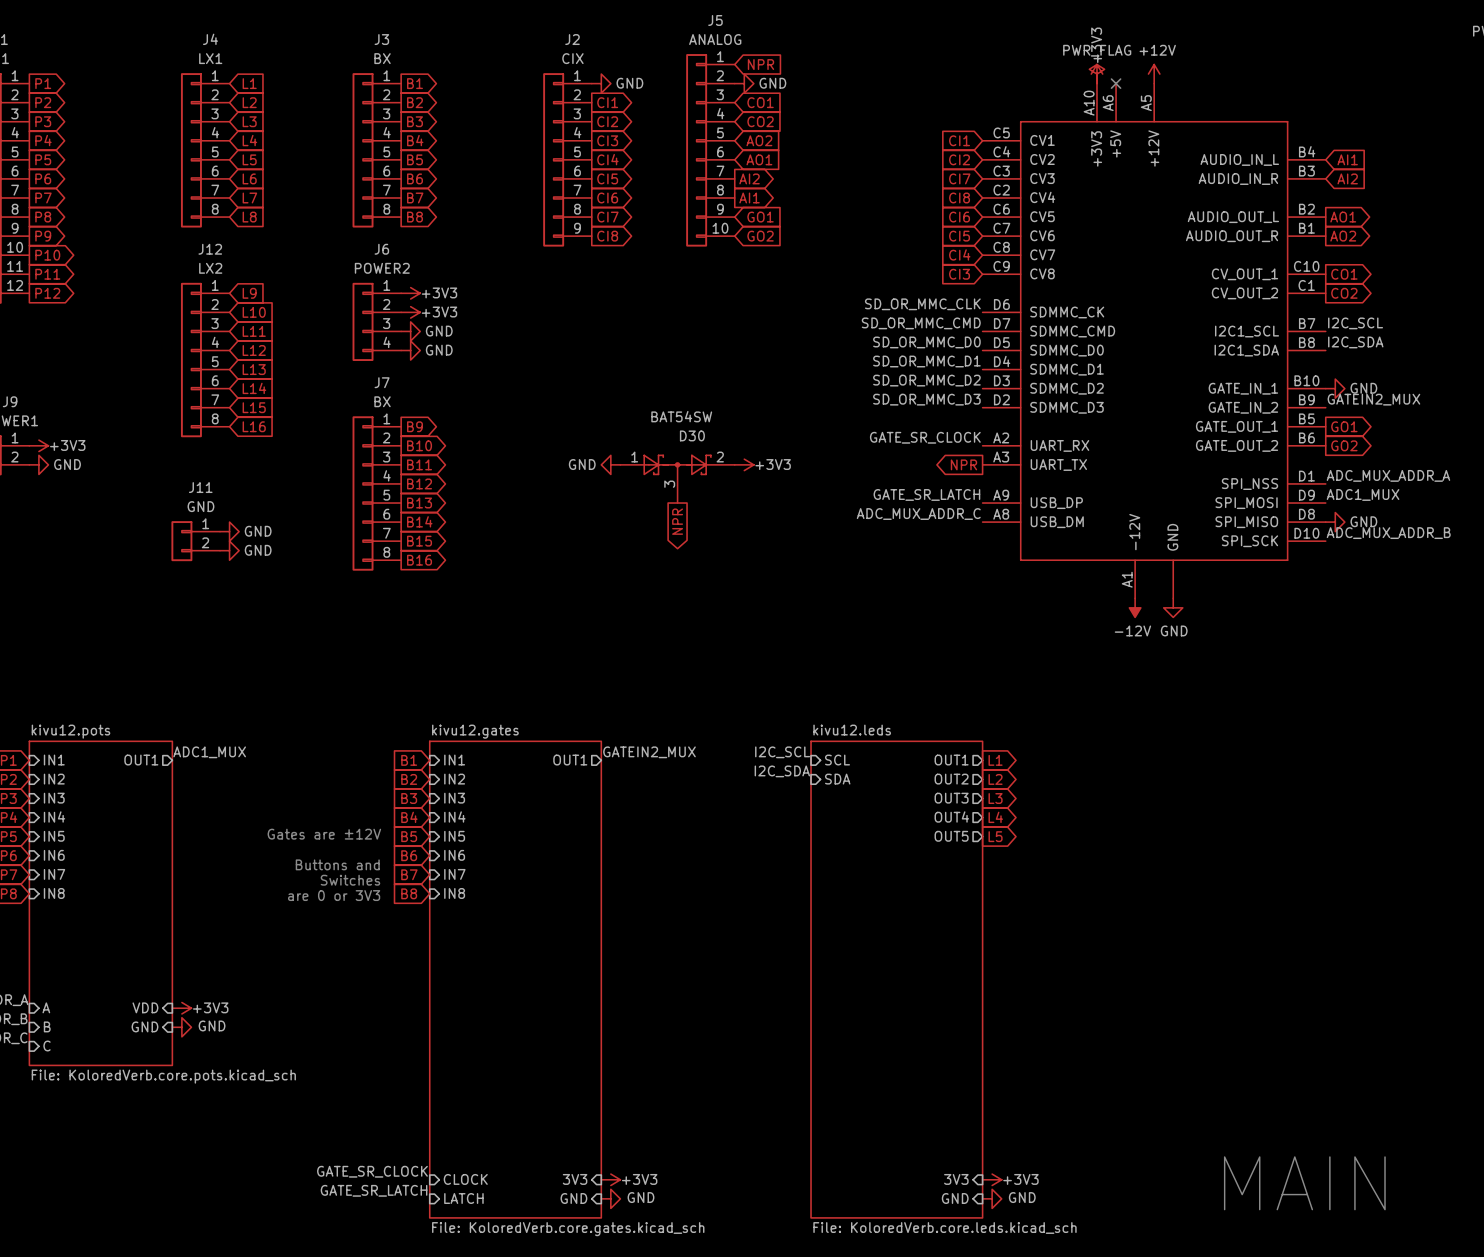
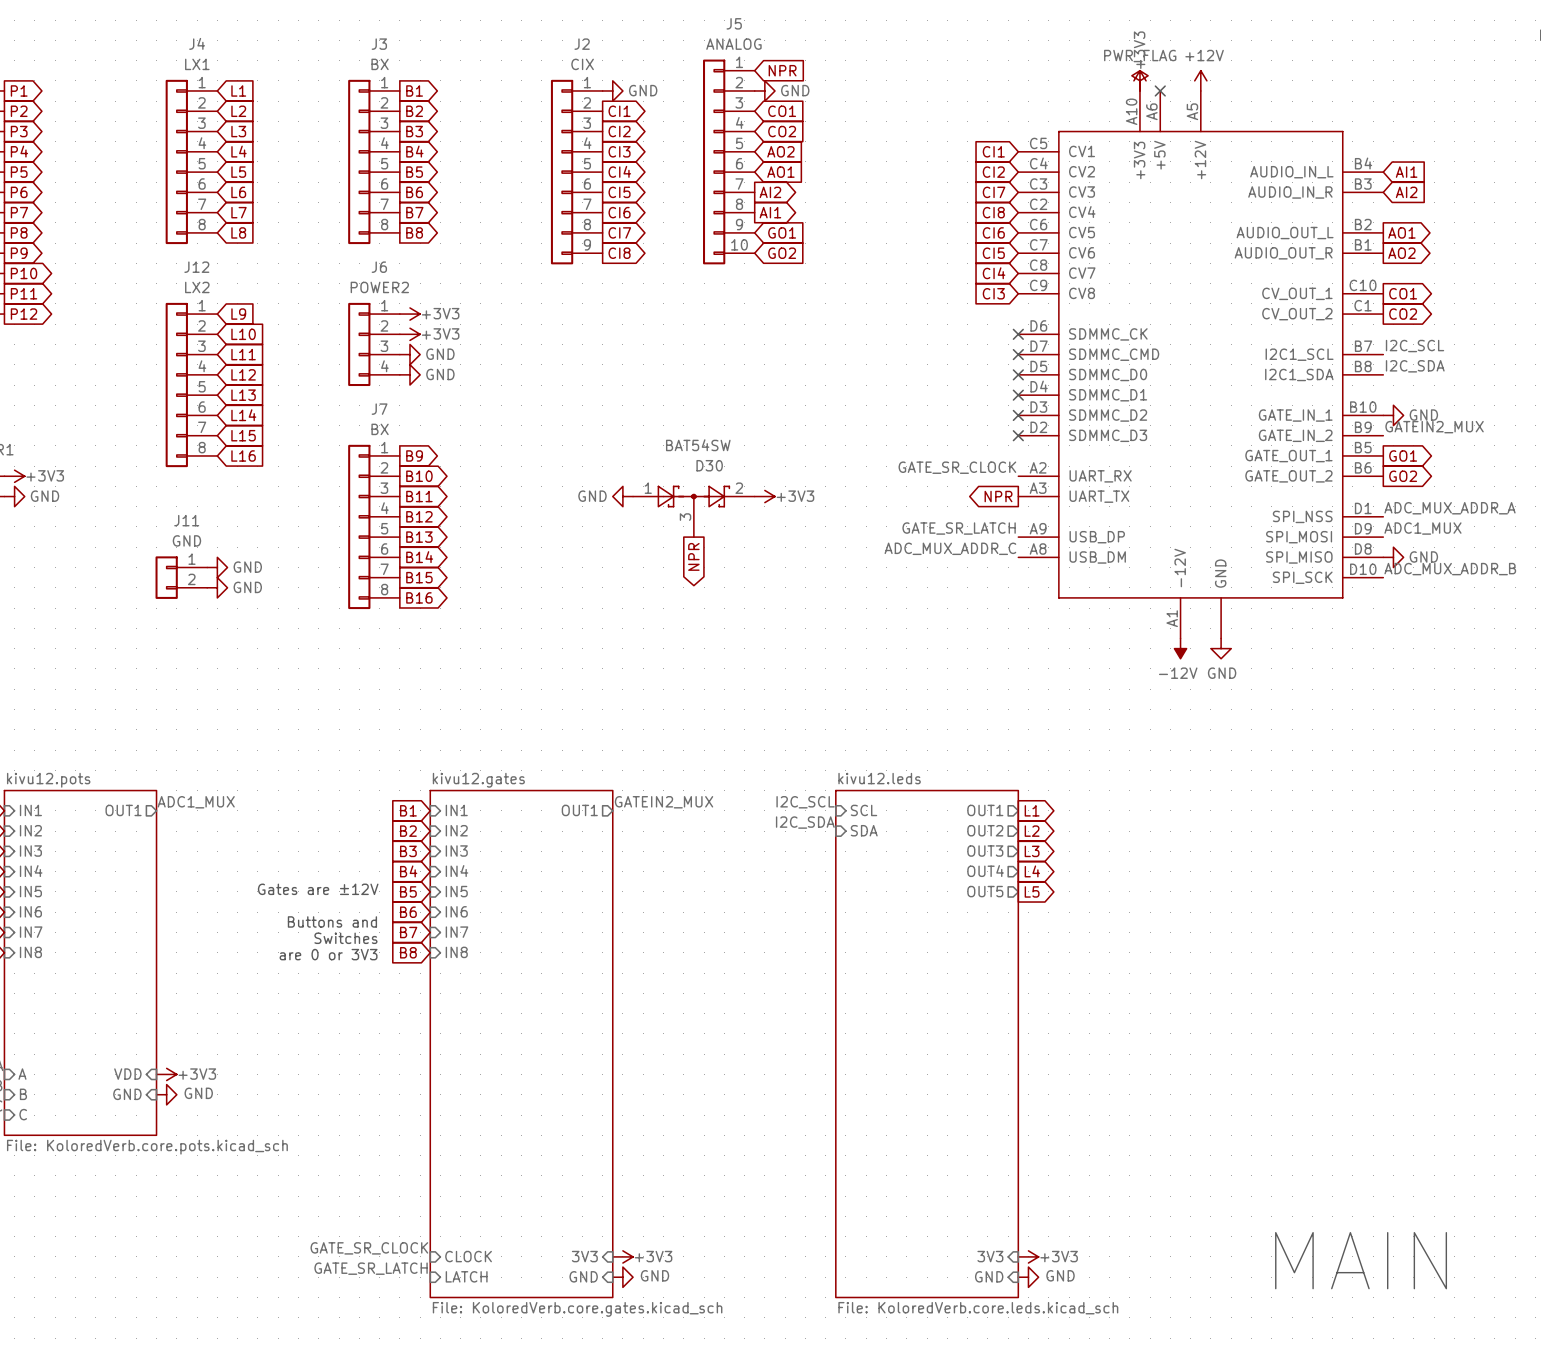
label: SD_OR_MMC_CLK (922, 304) -> none
no-connect mark: none -> (1018, 334)
label: SD_OR_MMC_CMD (921, 323) -> none
no-connect mark: none -> (1018, 354)
label: SD_OR_MMC_D0 (926, 342) -> none
no-connect mark: none -> (1018, 374)
label: SD_OR_MMC_D1 (926, 361) -> none
no-connect mark: none -> (1018, 395)
label: SD_OR_MMC_D2 (926, 380) -> none
no-connect mark: none -> (1018, 415)
label: SD_OR_MMC_D3 (926, 399) -> none
no-connect mark: none -> (1018, 435)

